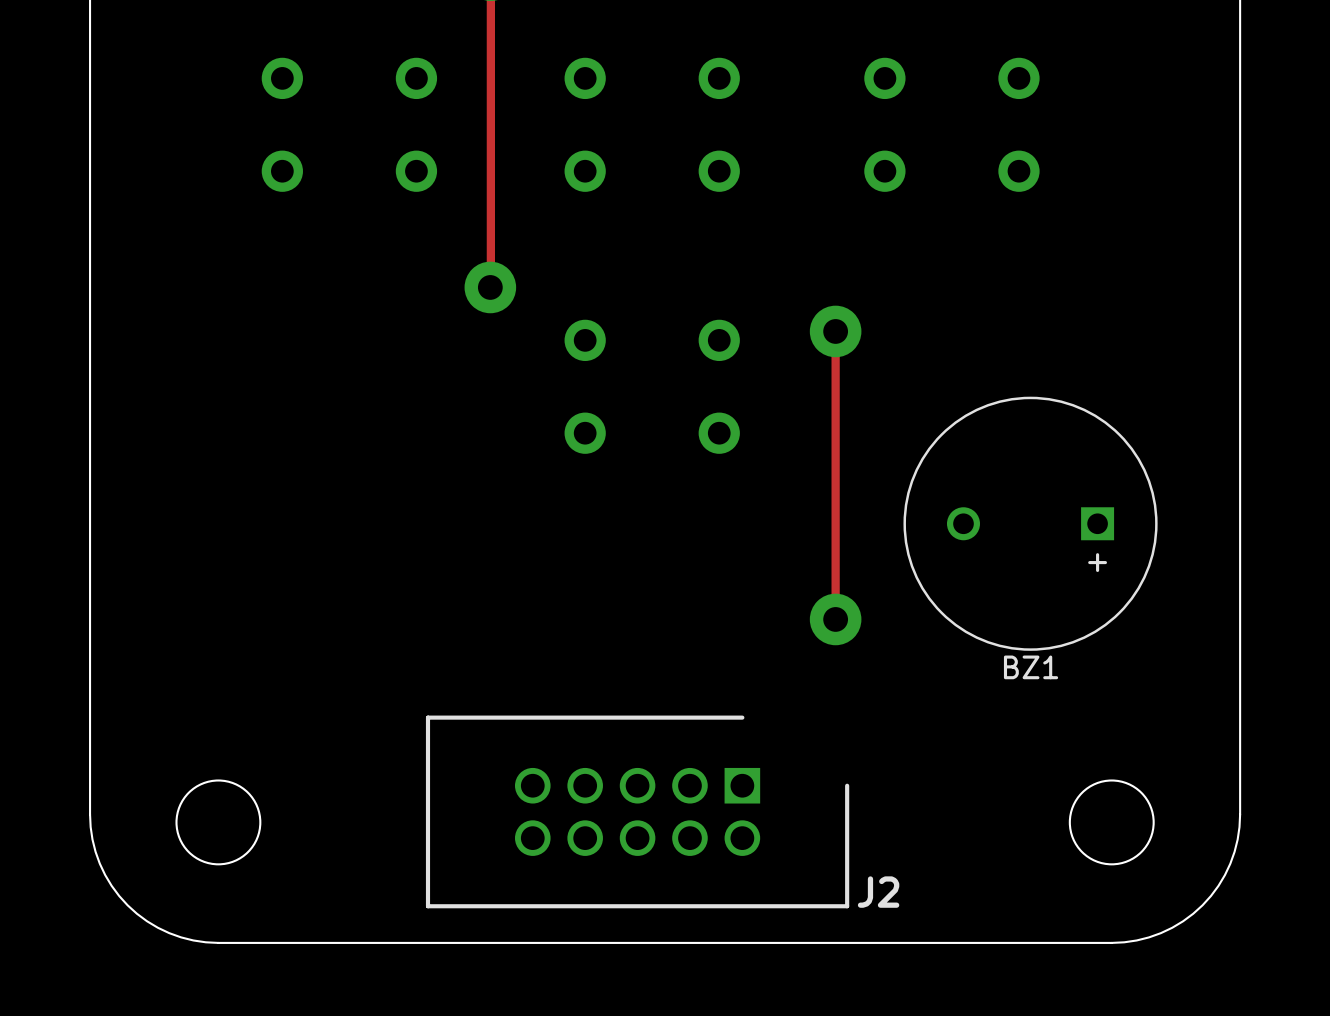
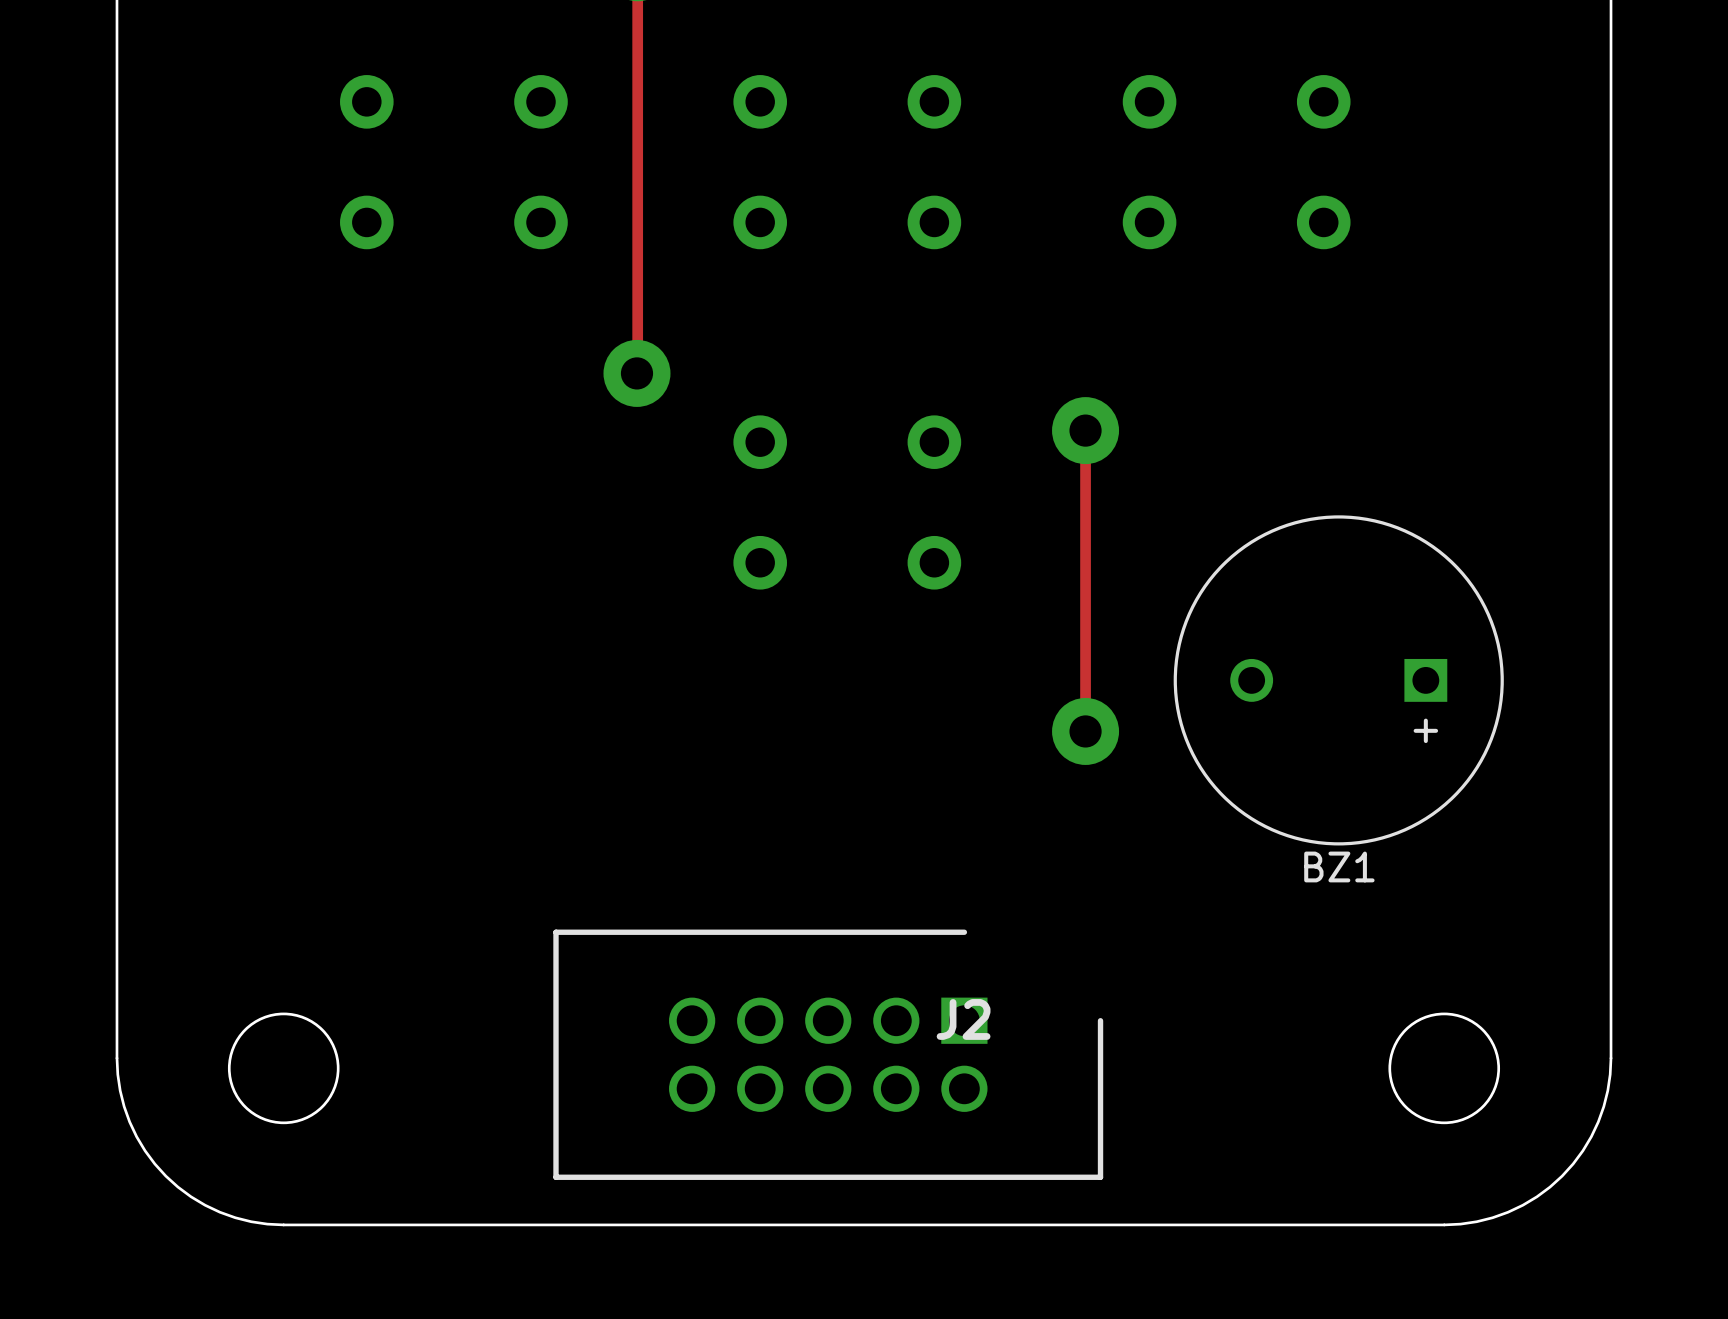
via position: (835, 619) -> (1085, 731)
J2 name position: J2 (878, 892) -> J2 (963, 1019)

